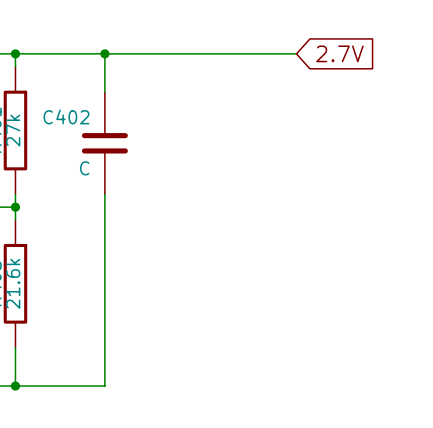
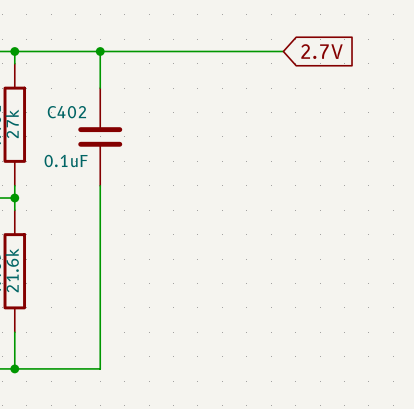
C402 value: C (84, 168) -> 0.1uF (66, 160)

